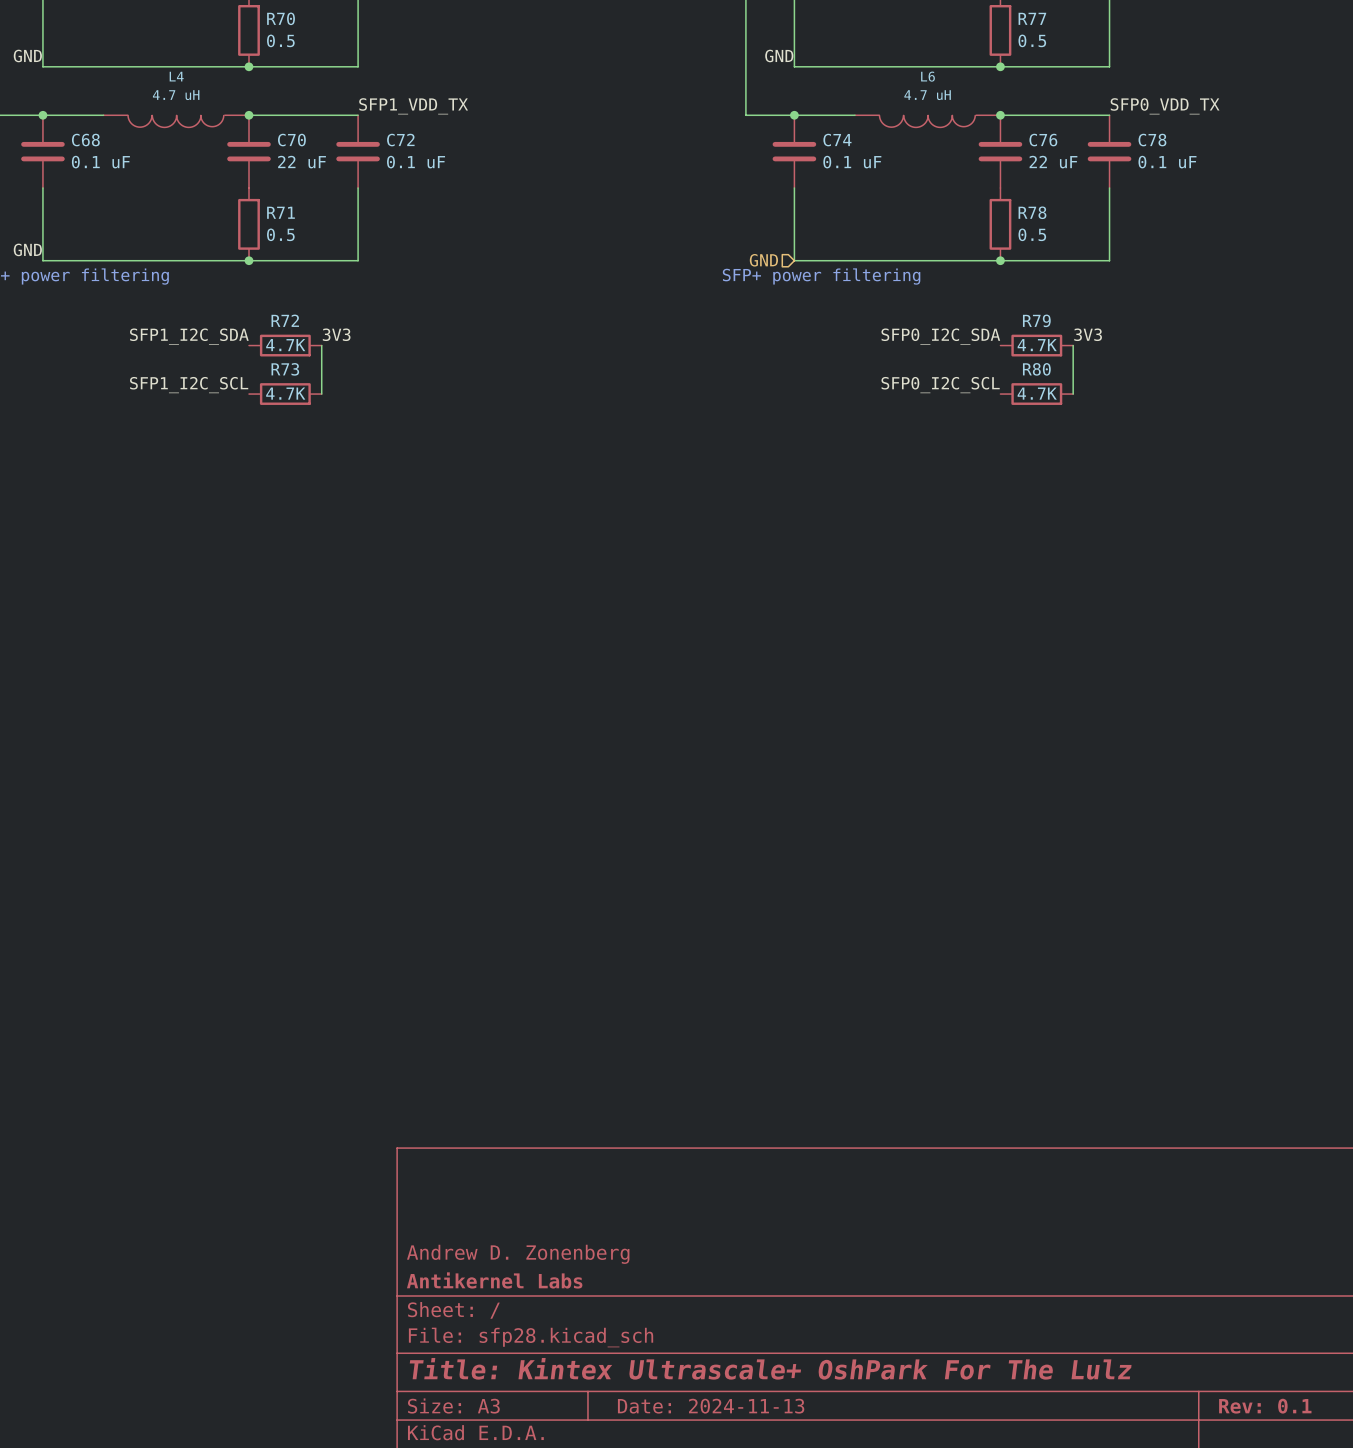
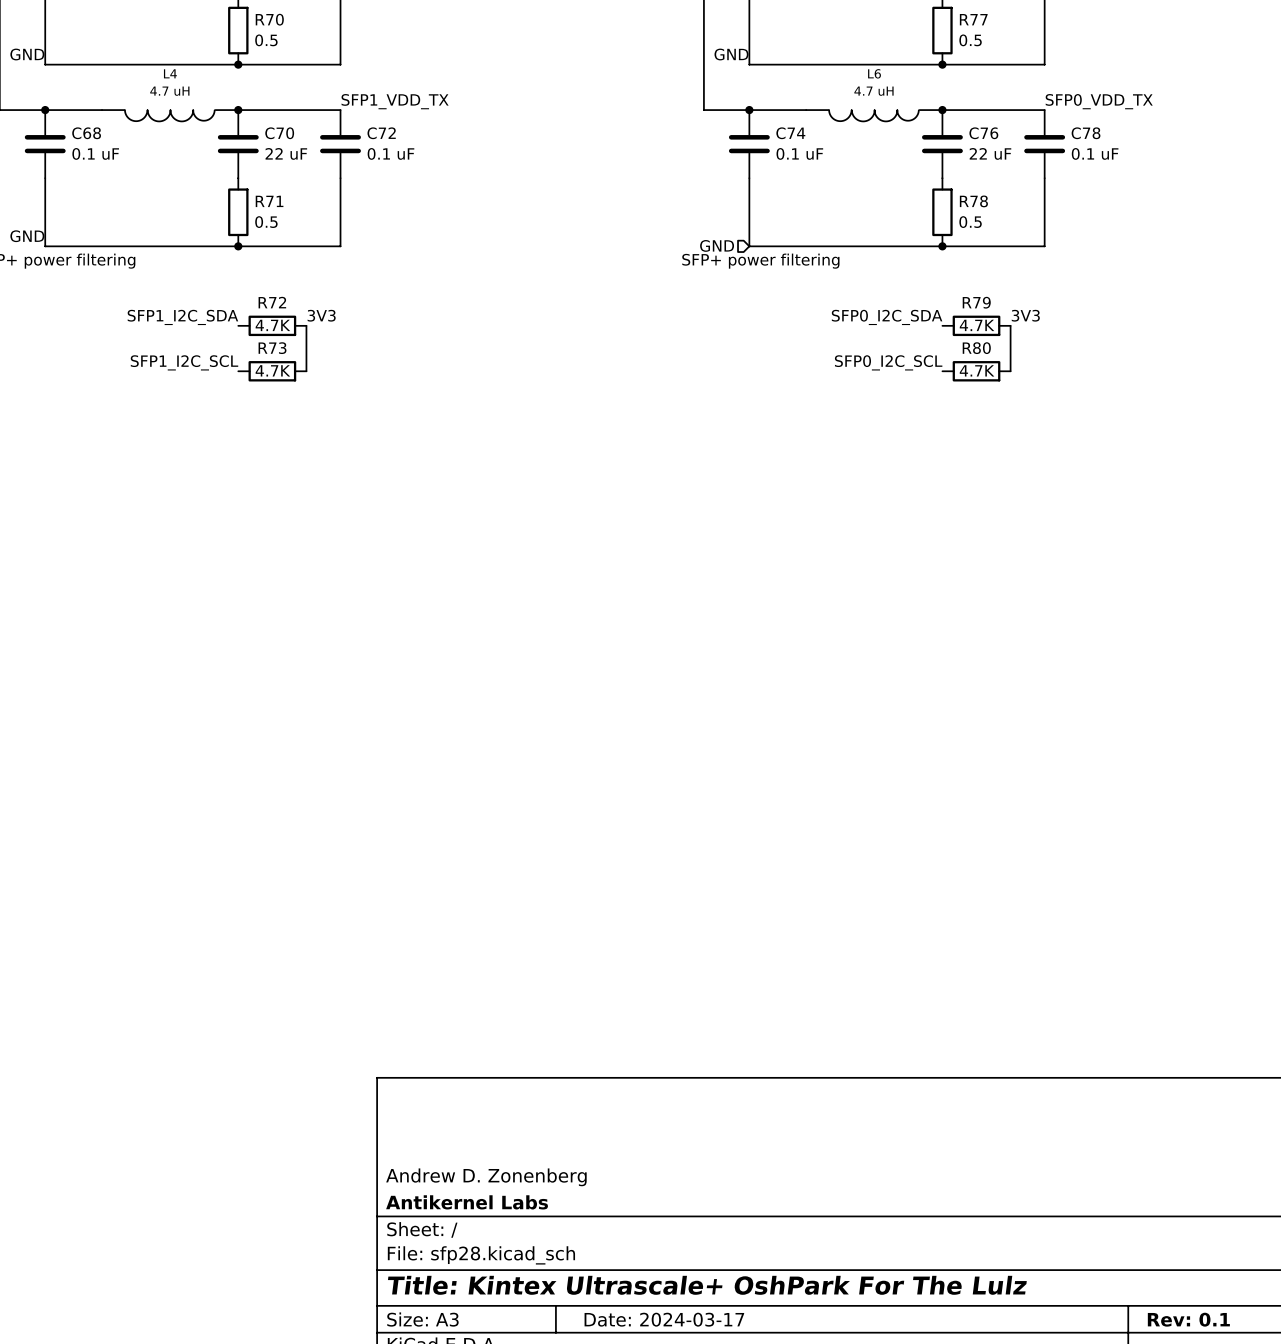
title block: Date: 2024-11-13 (711, 1406) -> Date: 2024-03-17 (664, 1319)

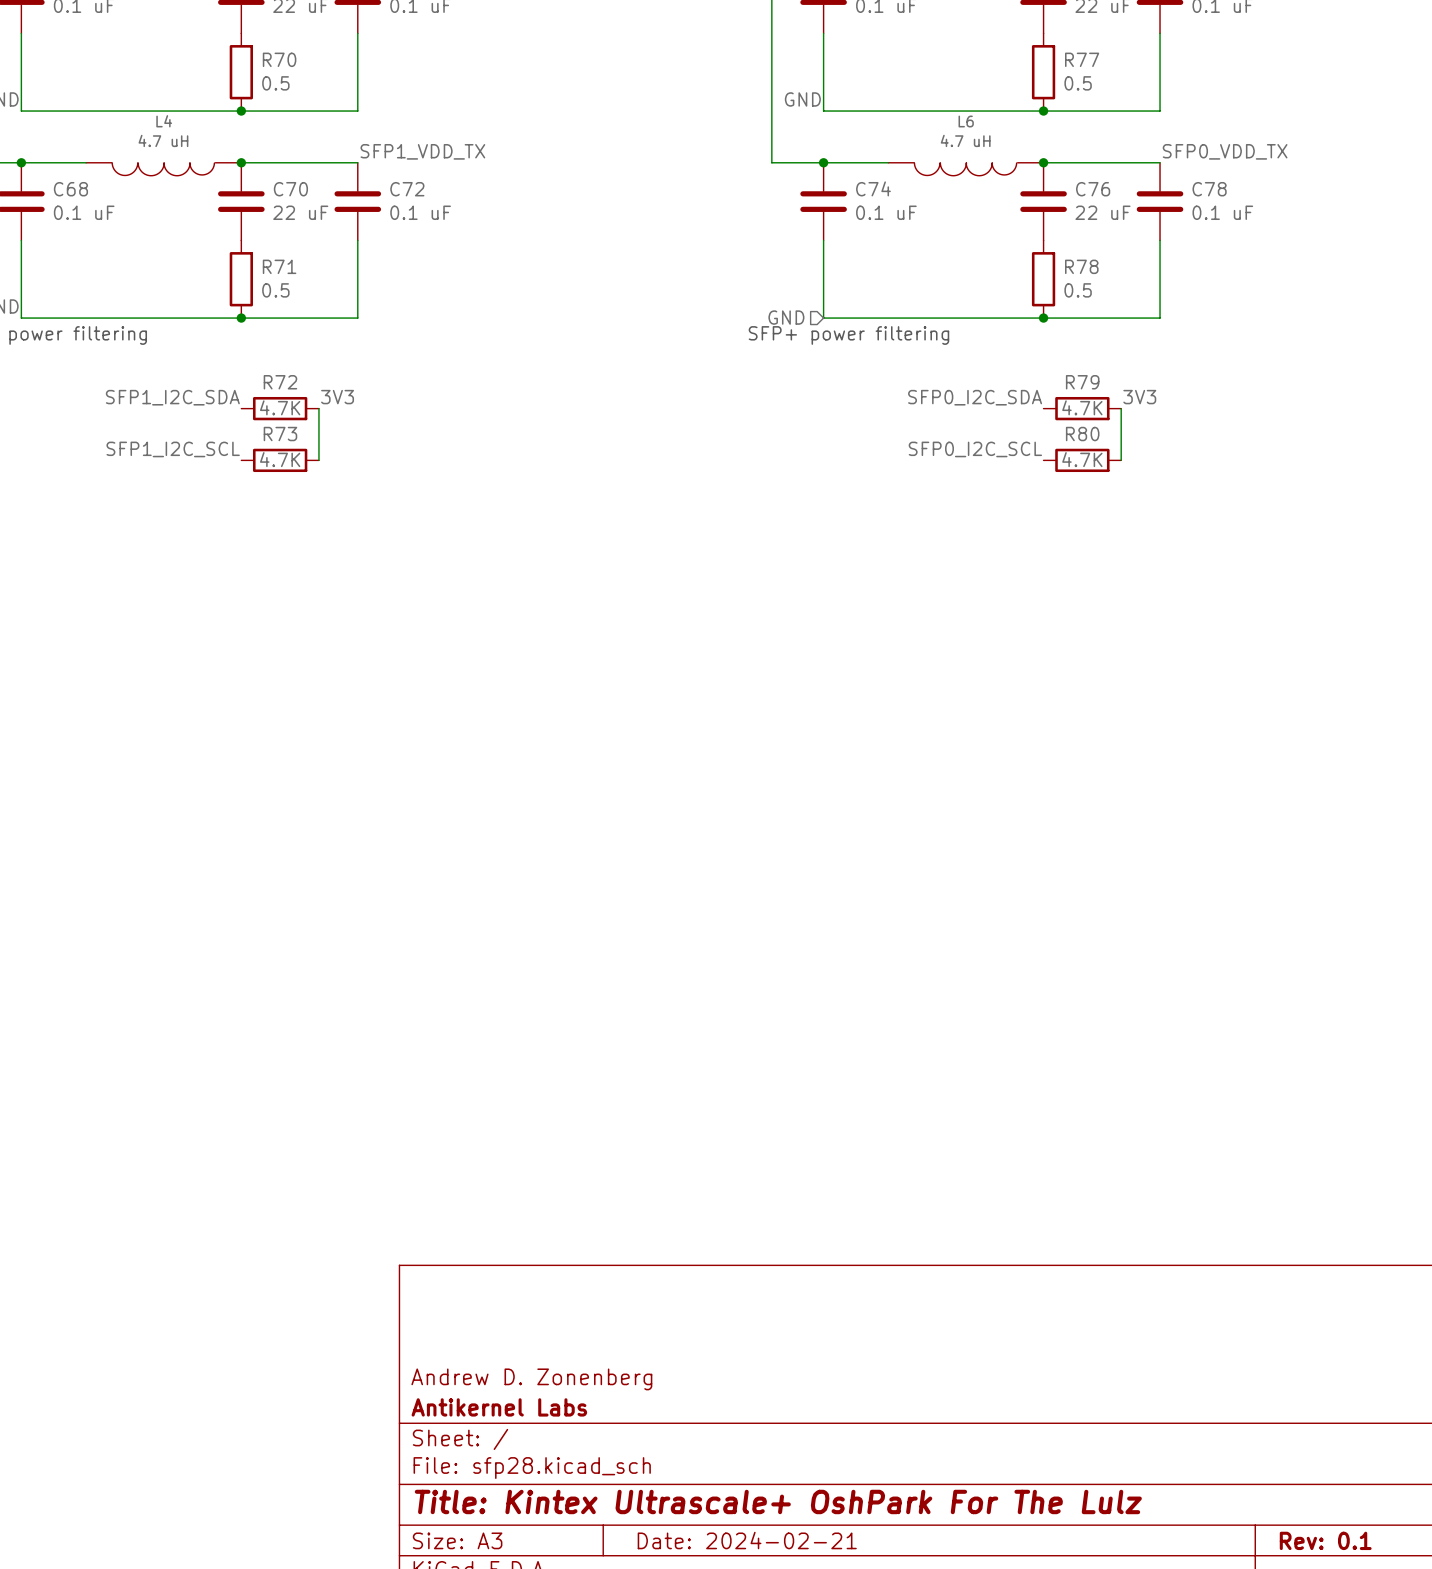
title block: Date: 2024-03-17 (664, 1319) -> Date: 2024-02-21 (747, 1540)

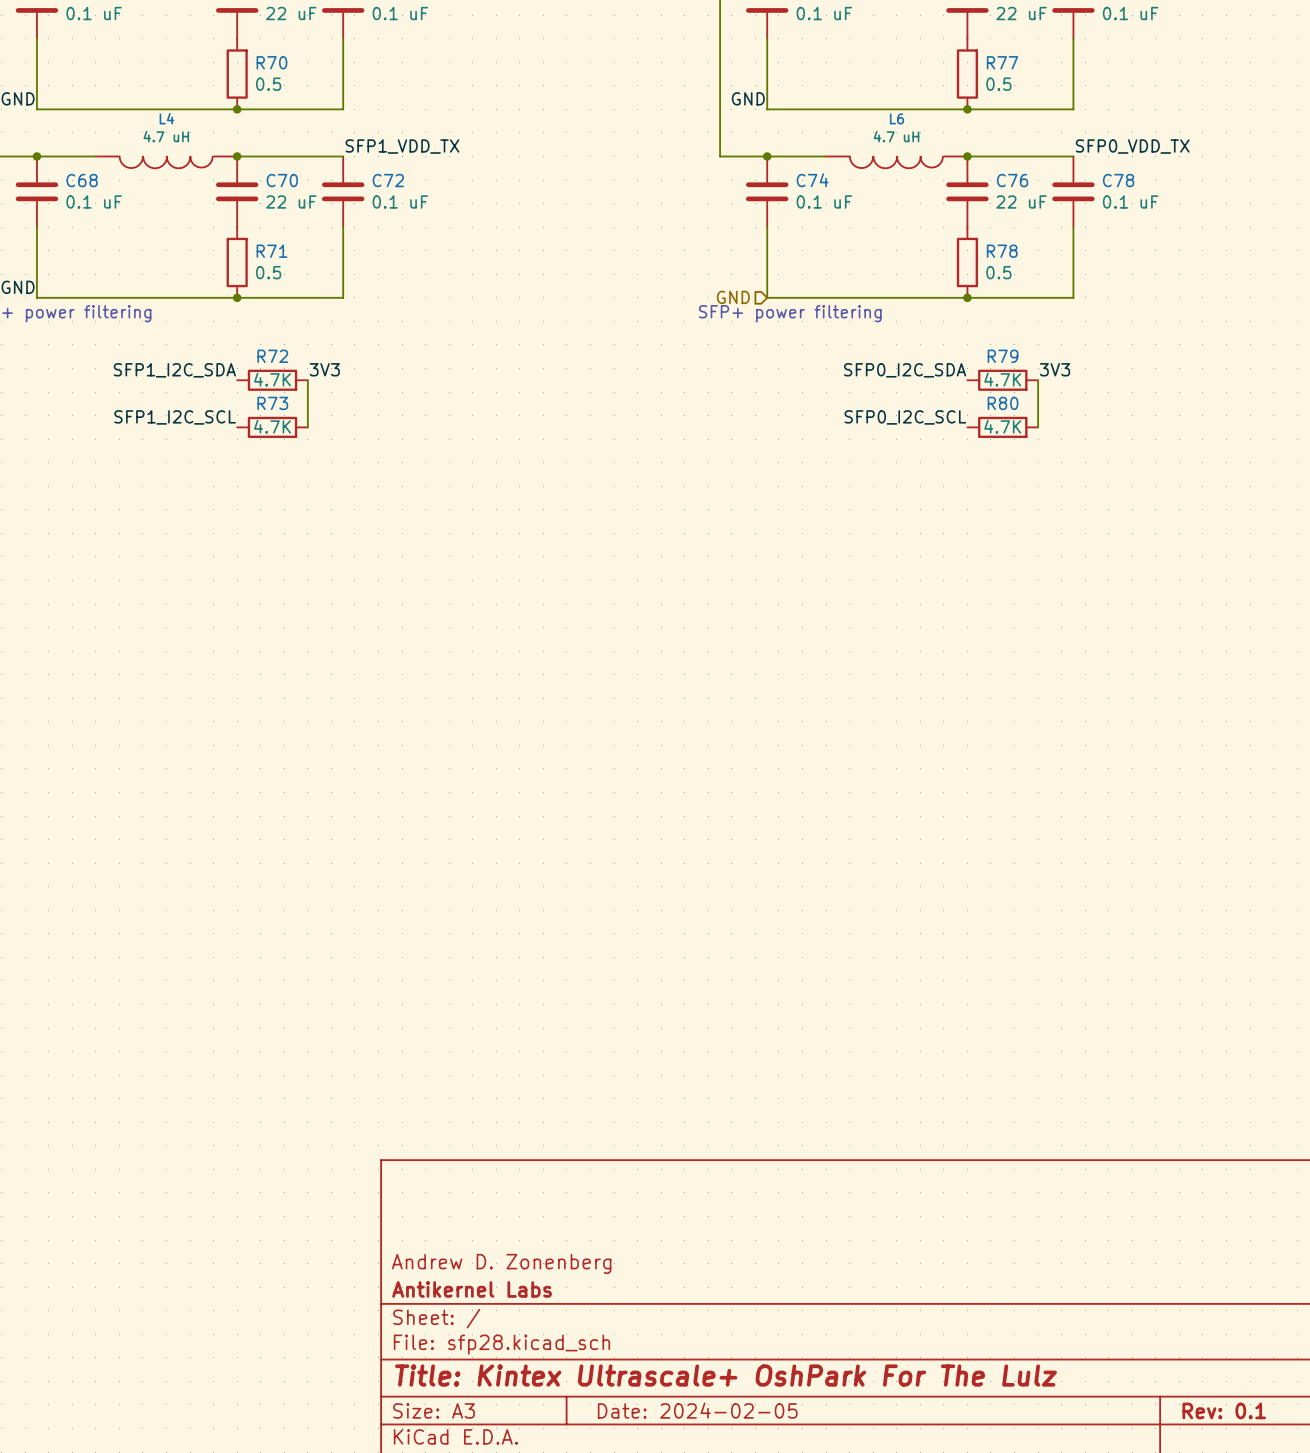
title block: Date: 2024-02-21 (747, 1540) -> Date: 2024-02-05 (697, 1410)

